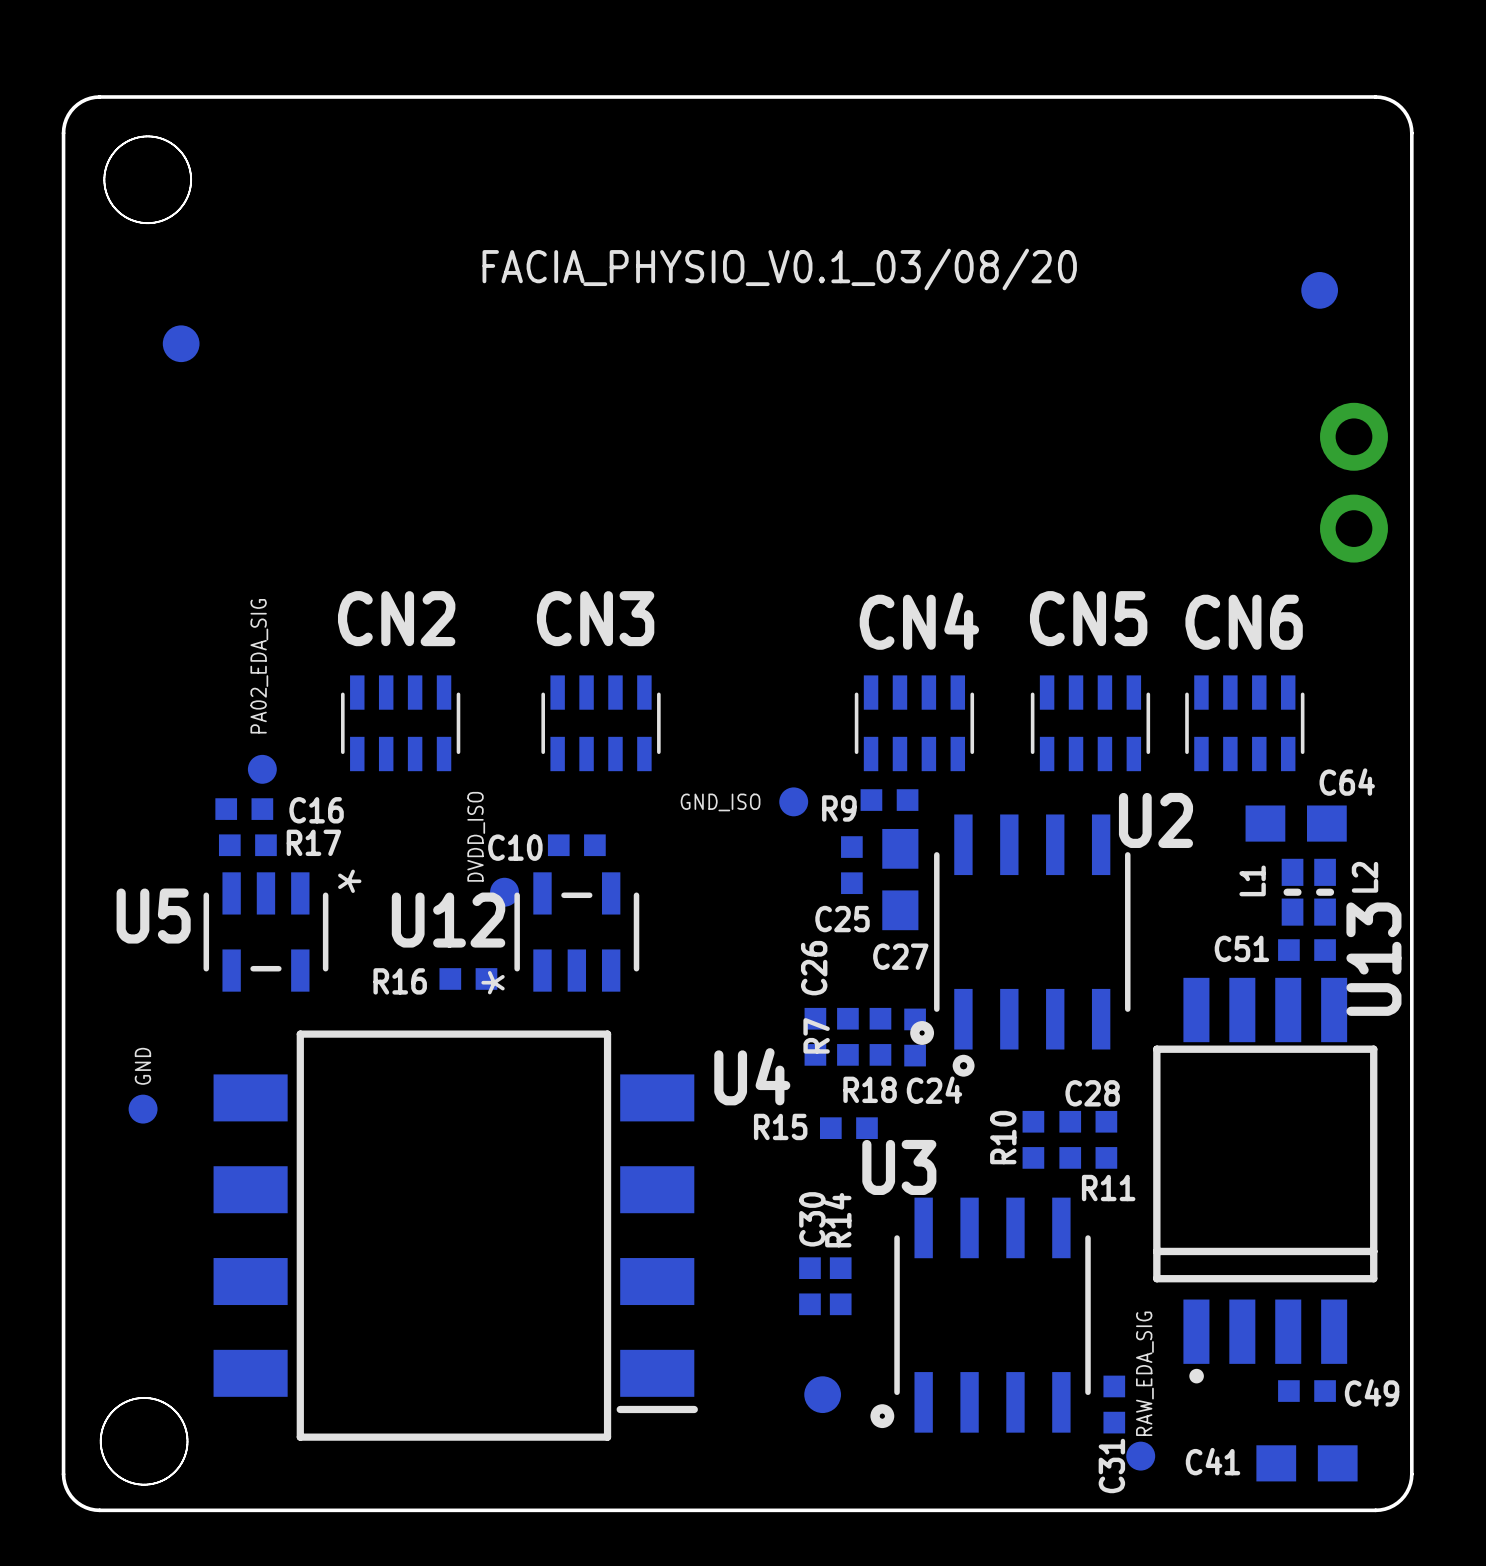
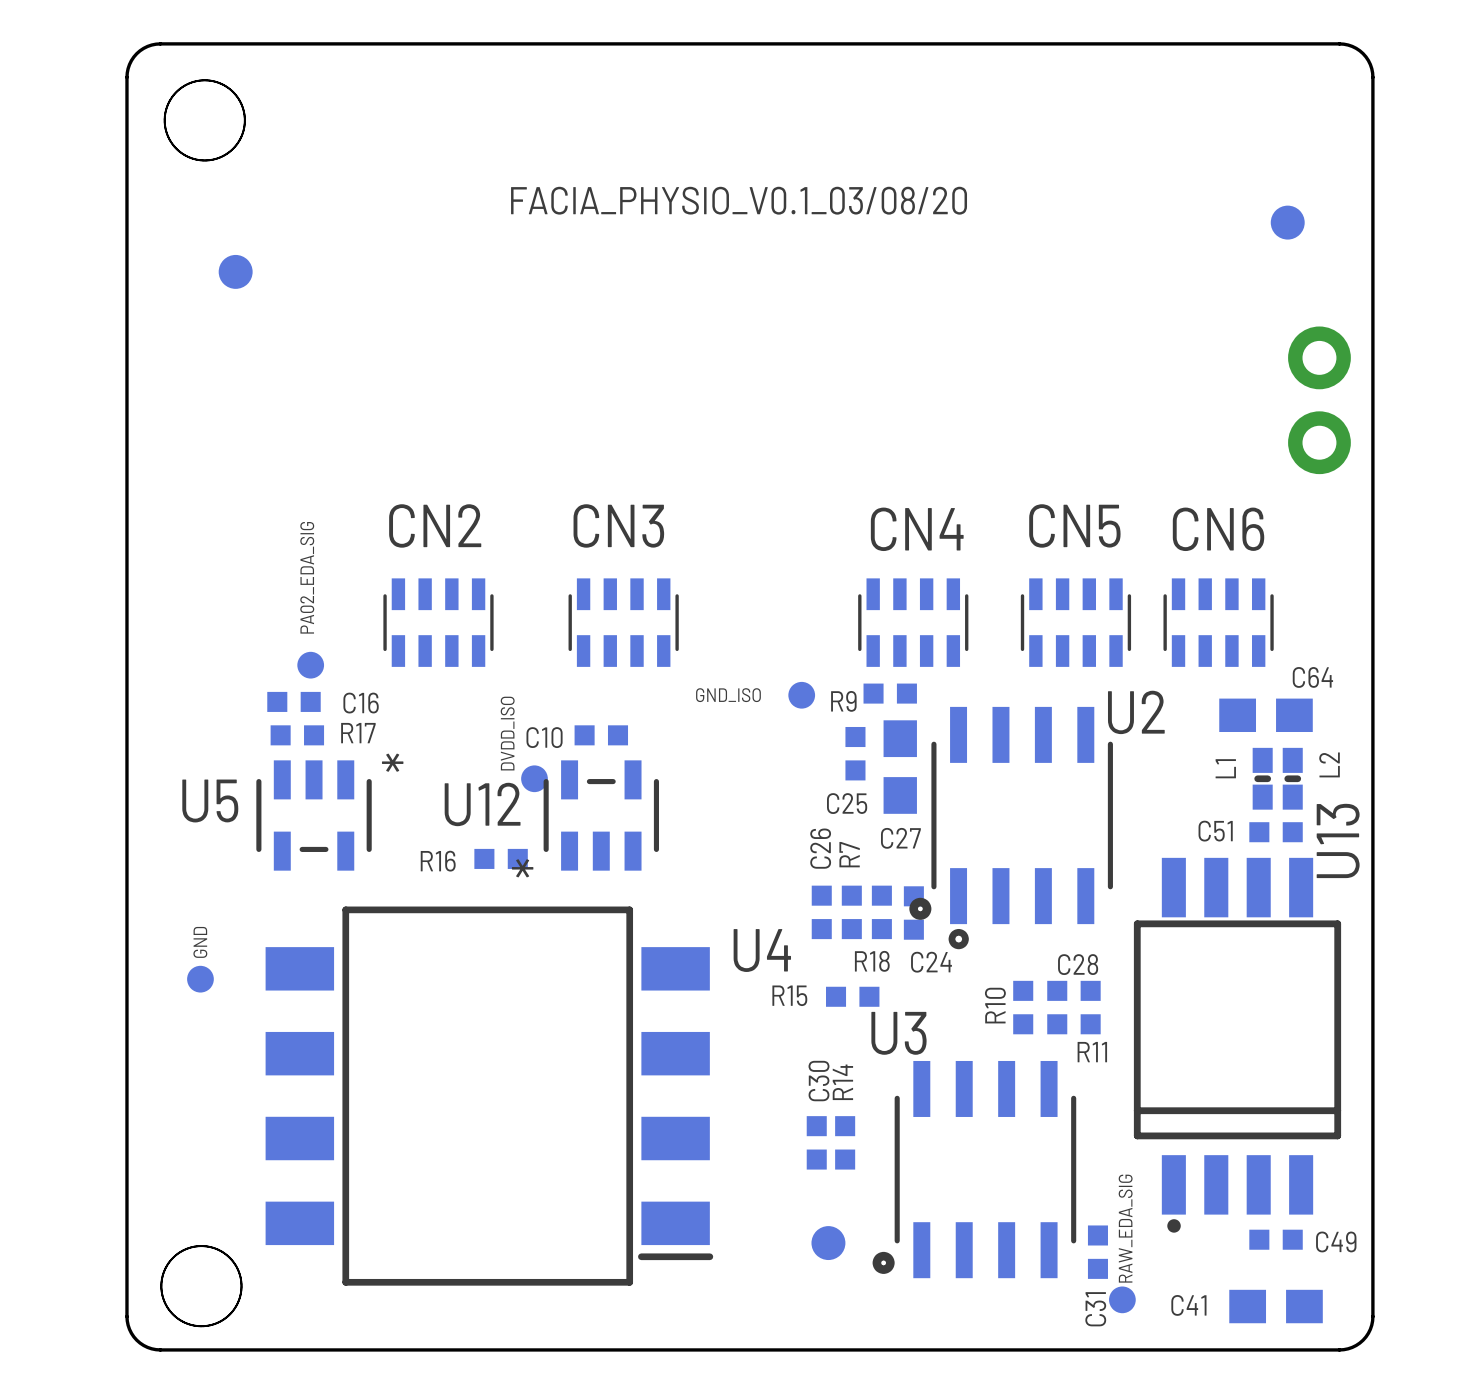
R7 name position: R7 (816, 1035) -> R7 (849, 854)

